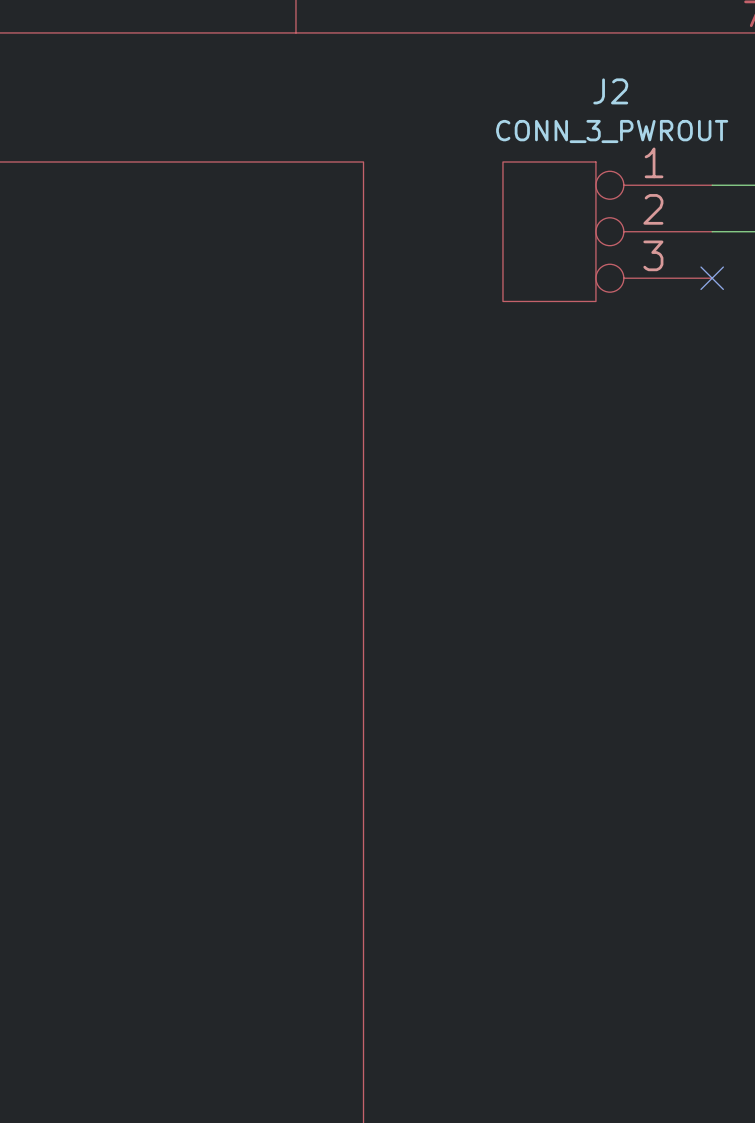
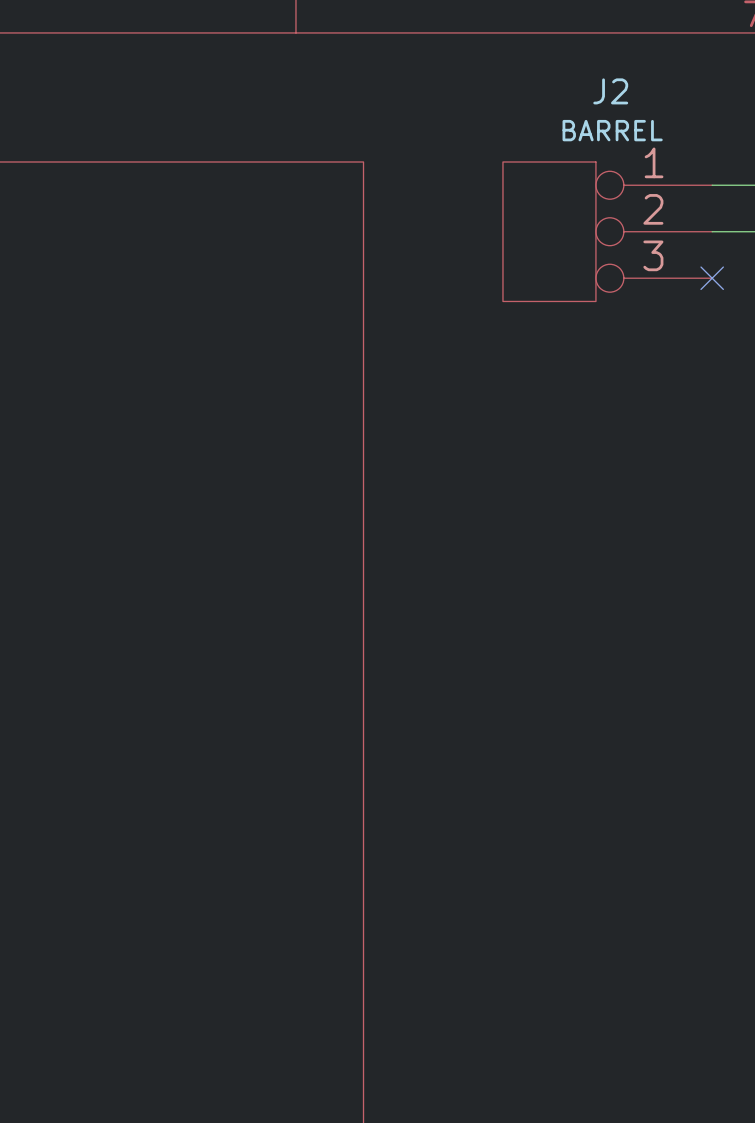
J2 value: CONN_3_PWROUT (612, 131) -> BARREL (612, 130)

